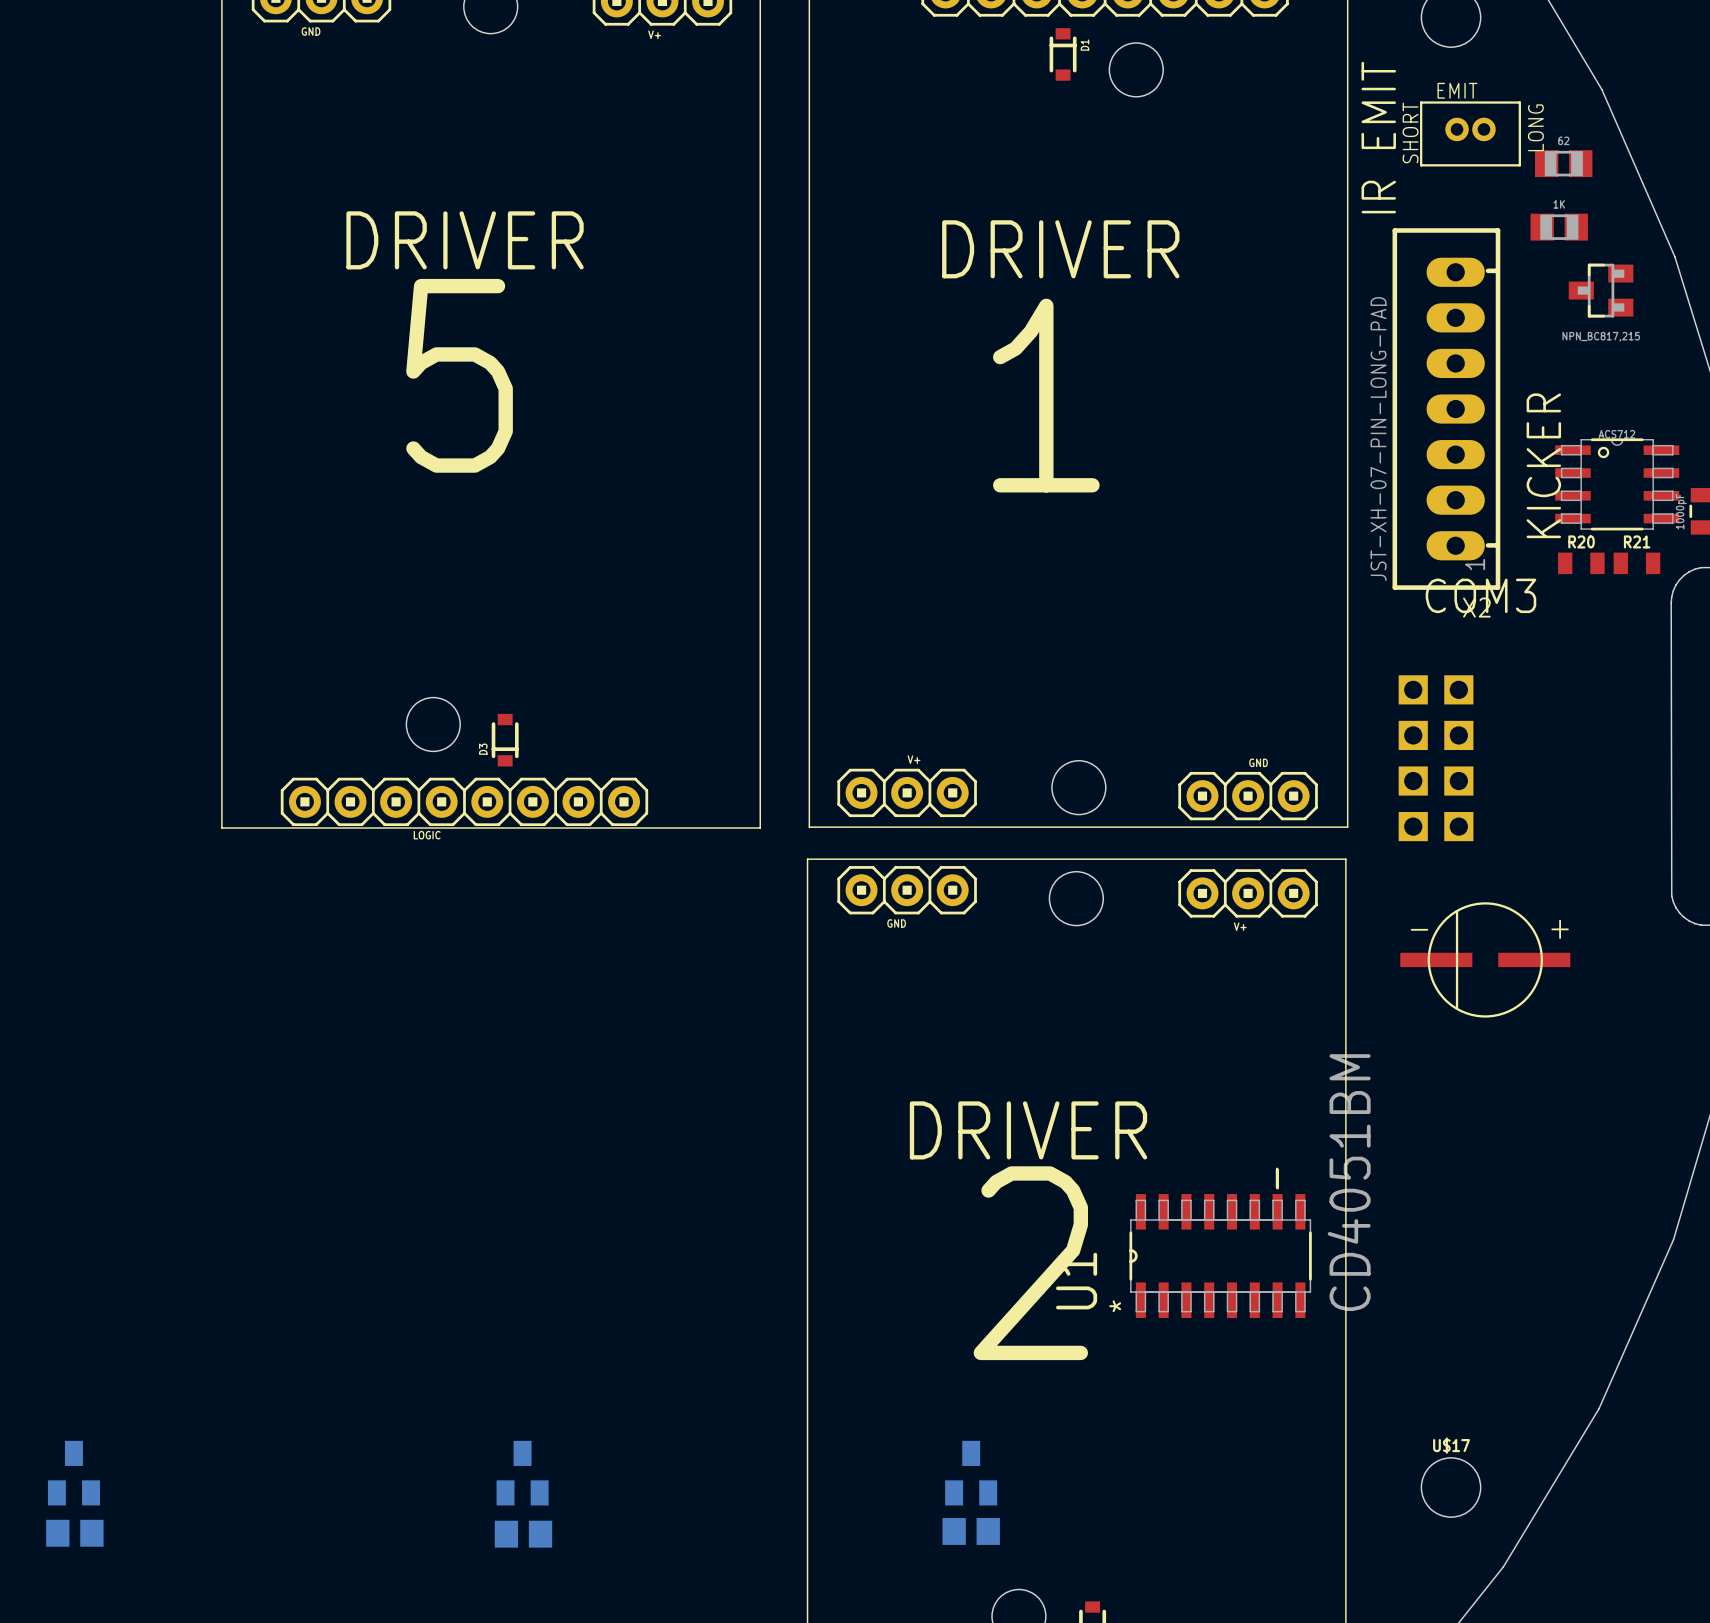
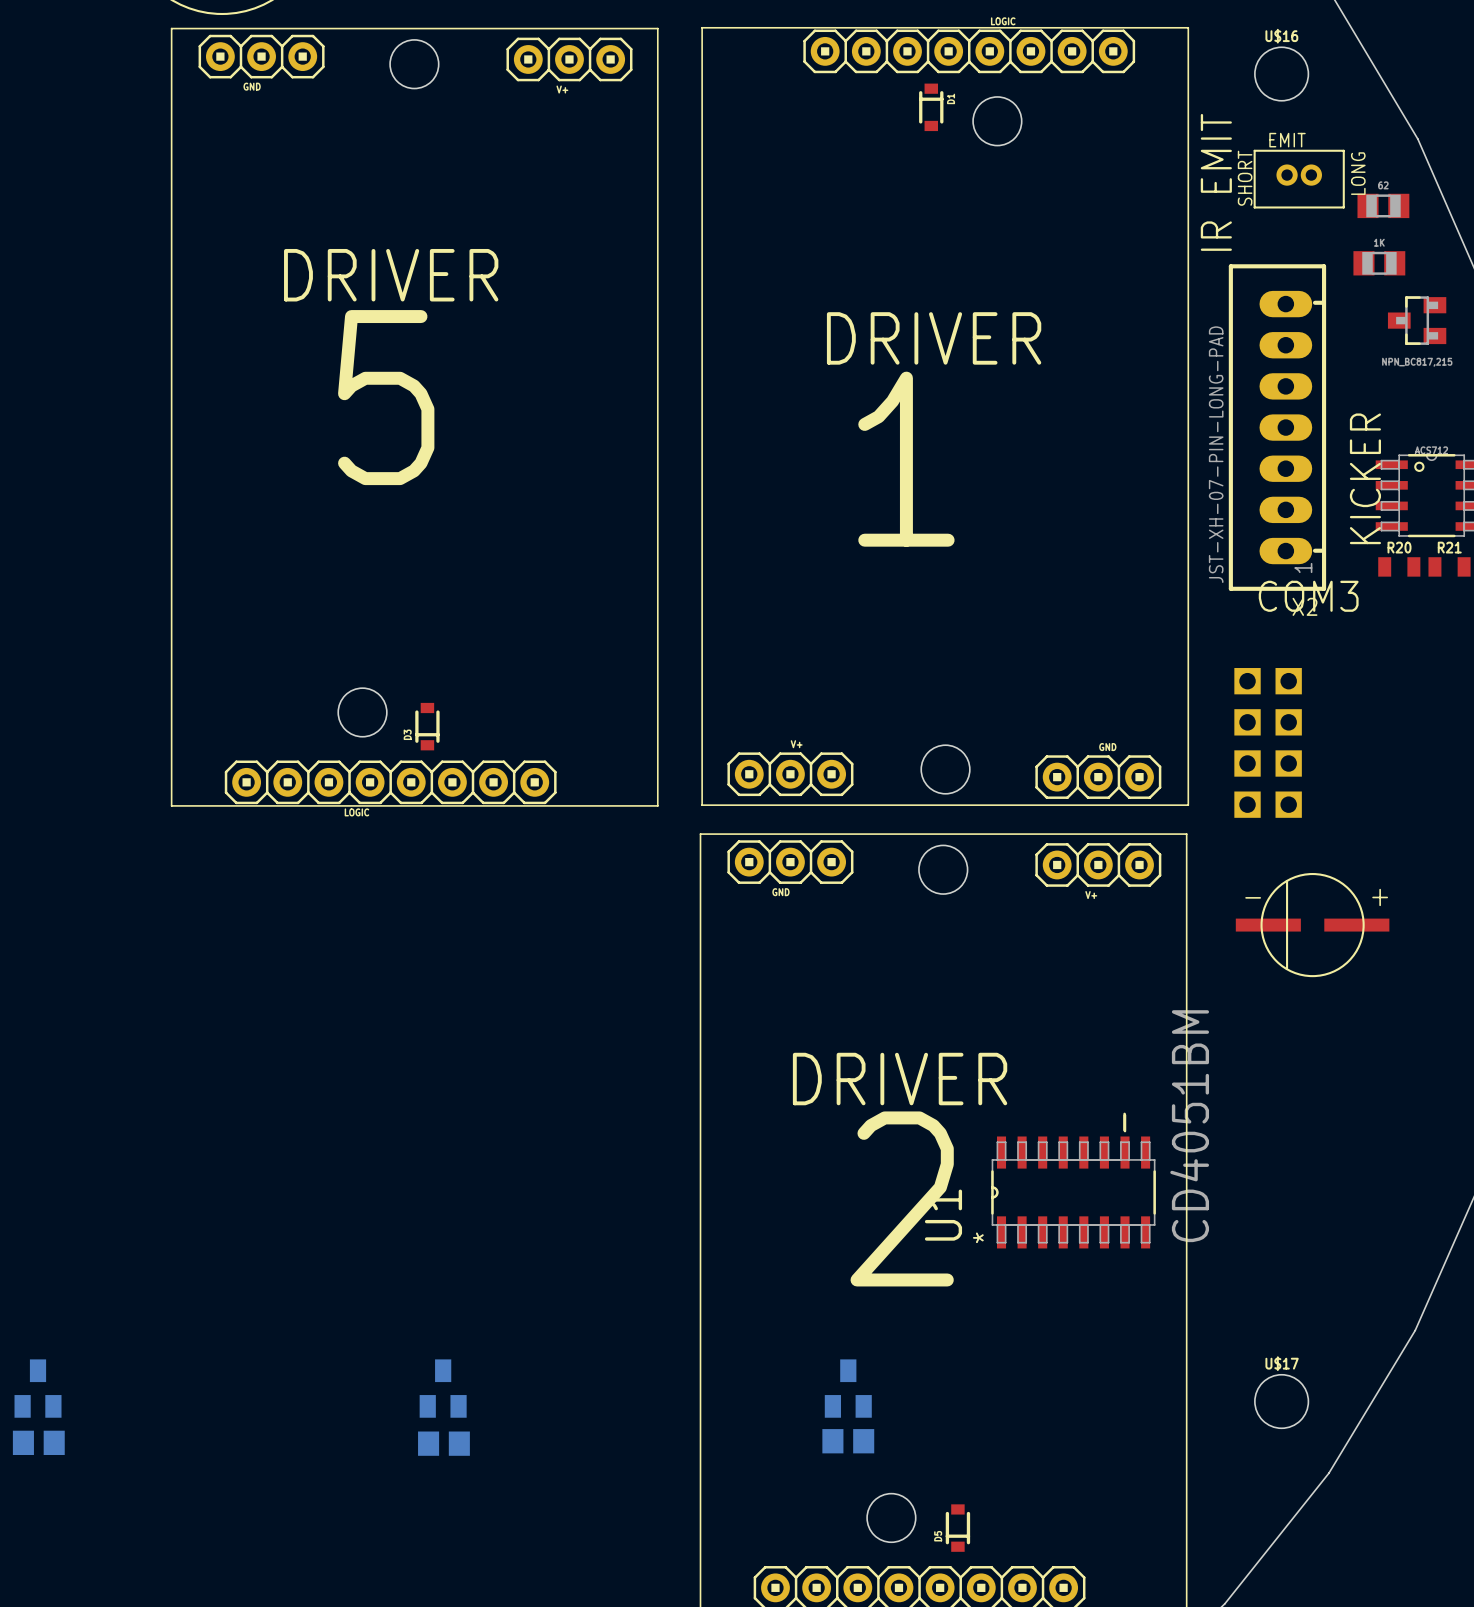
text position: DRIVER (1060, 249) -> DRIVER (934, 338)
text position: 1 (1046, 395) -> 1 (906, 459)

